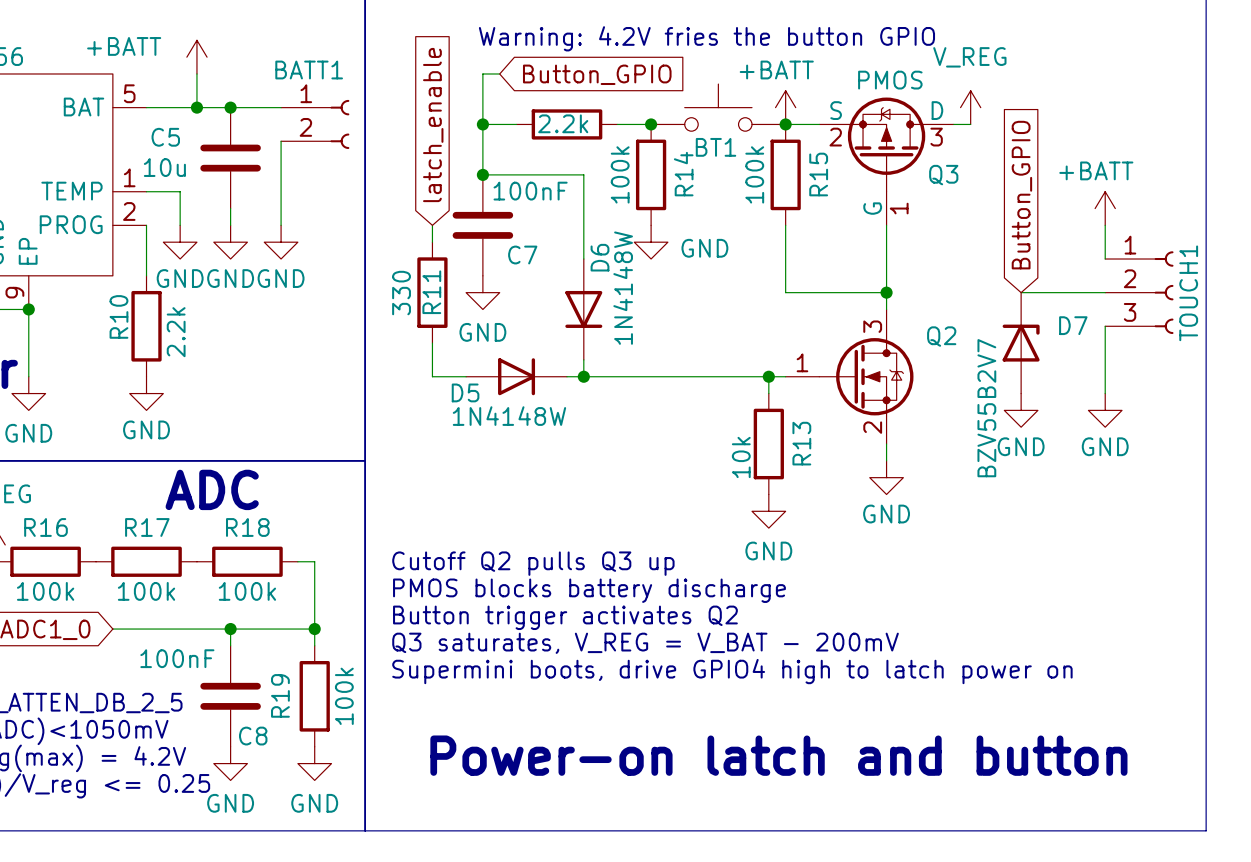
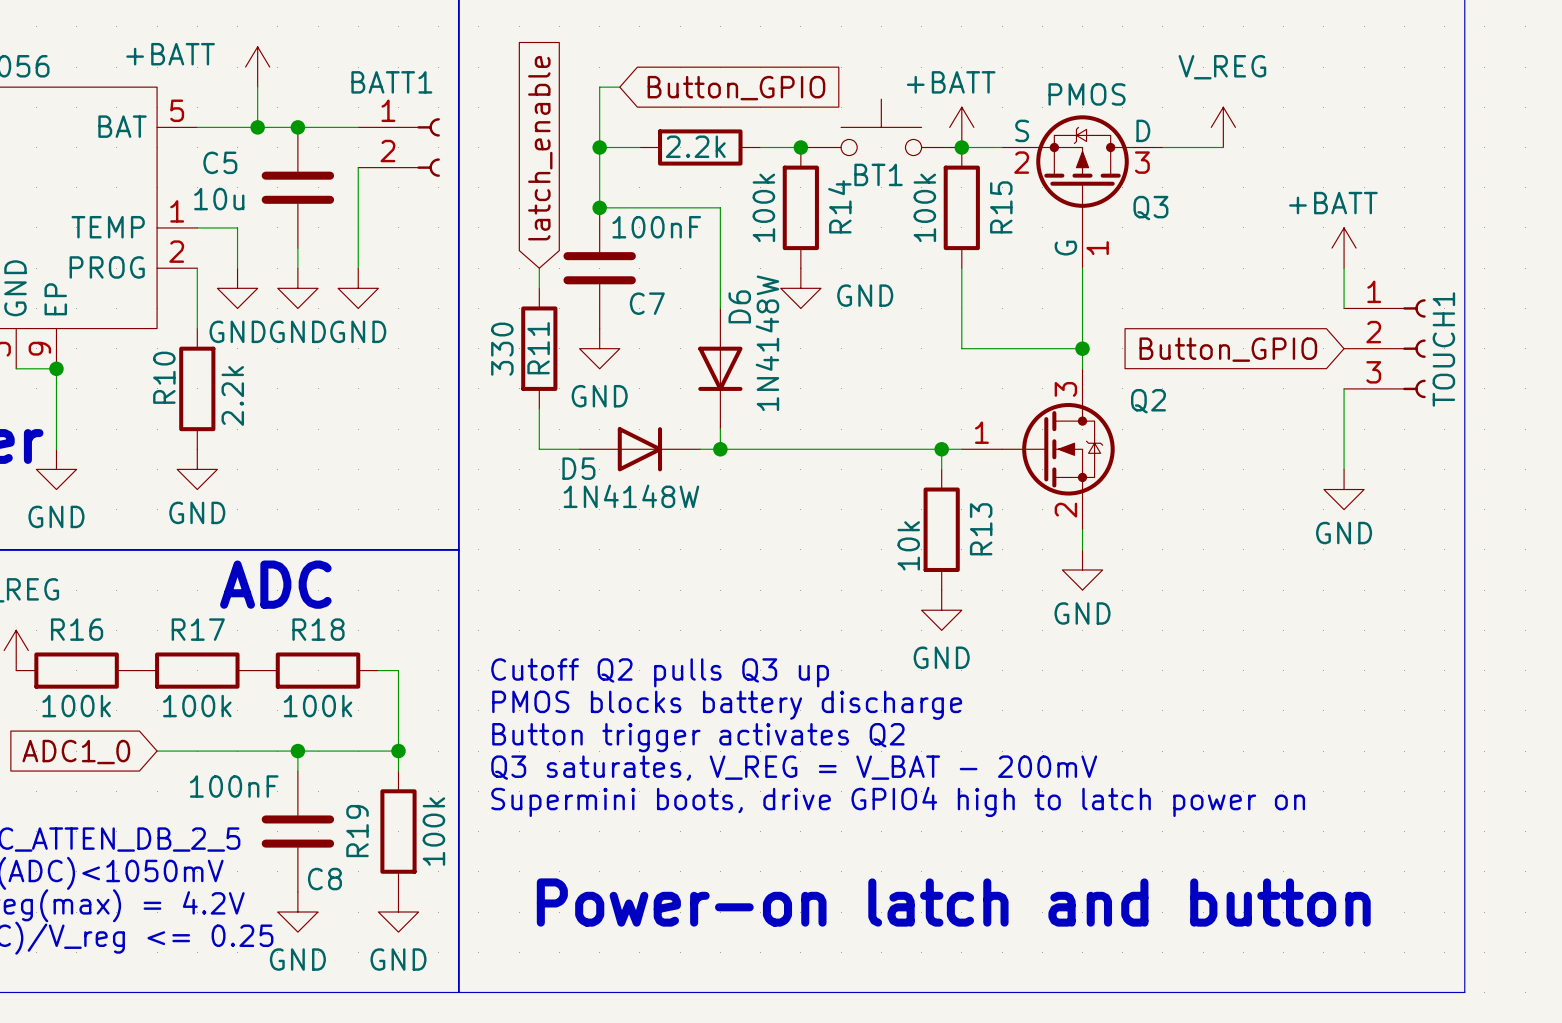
text: Warning: 4.2V fries the button GPIO (706, 38) -> none
power symbol position: V_REG (970, 107) -> V_REG (1223, 127)
wire: none -> (1183, 147) (1223, 147)
global label rotation: 0° (1021, 195) -> 90° counterclockwise (1228, 349)
wire: (1021, 292) (1105, 292) -> none
D7: BZV55B2V7 (1021, 343) -> none
power symbol: GND (1021, 410) -> none

